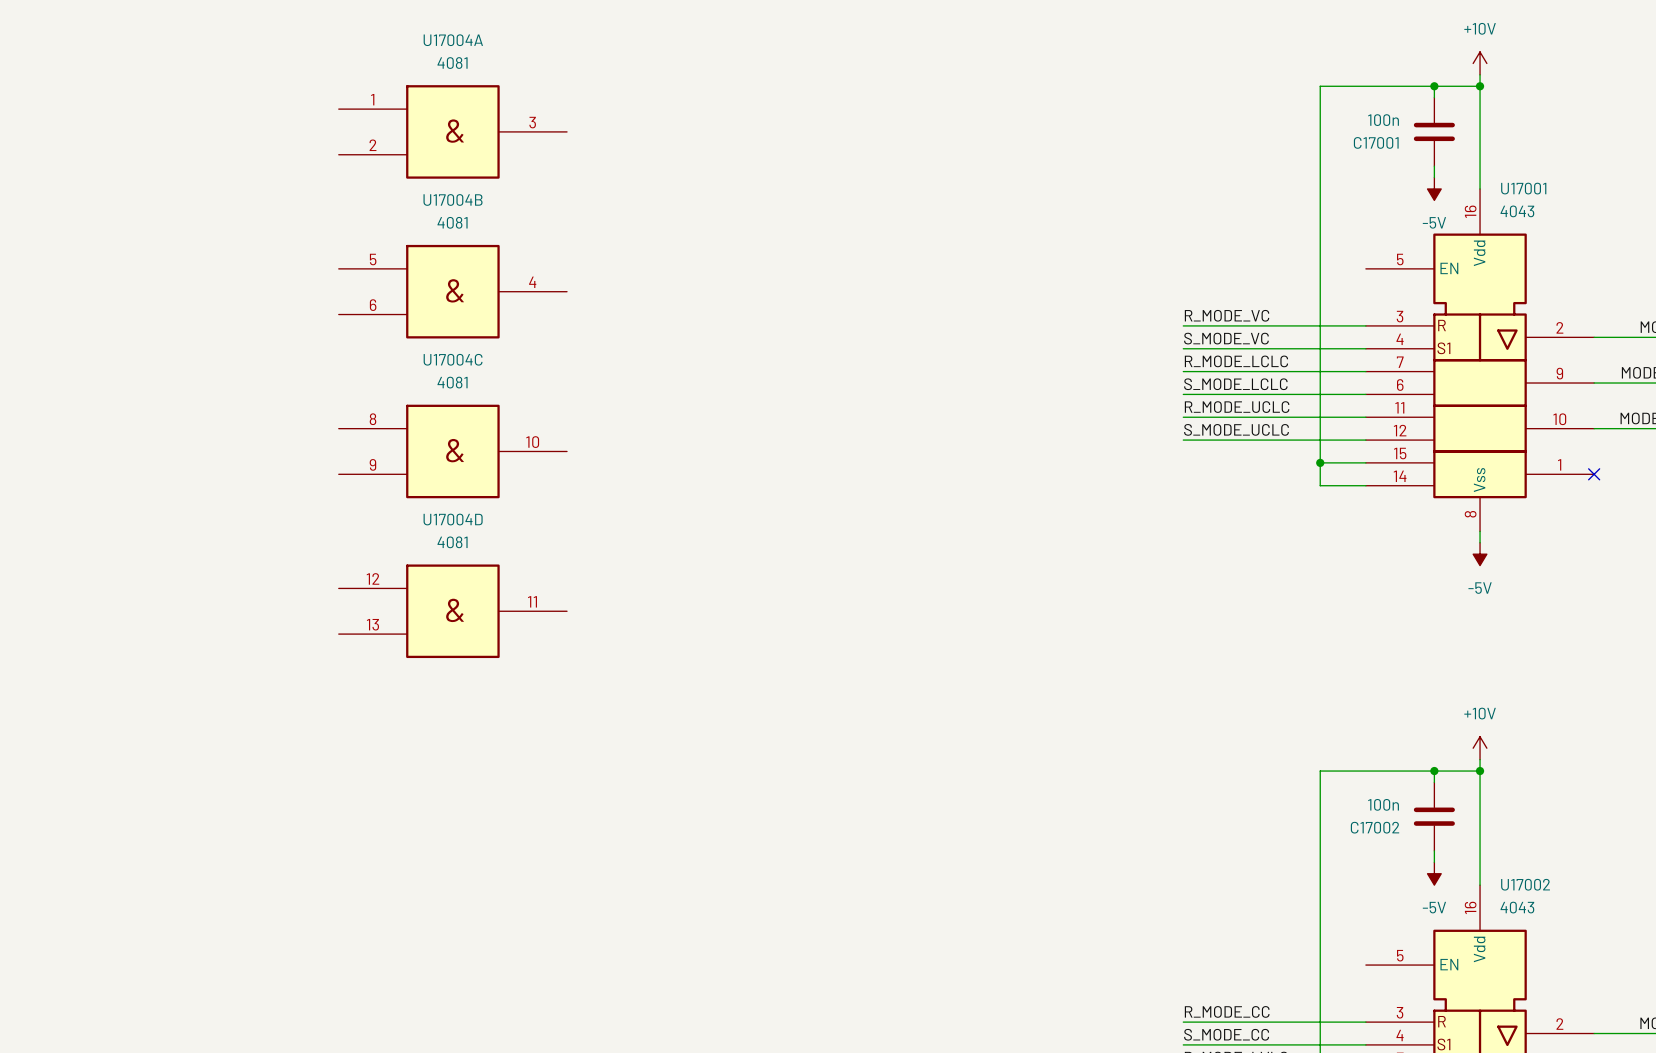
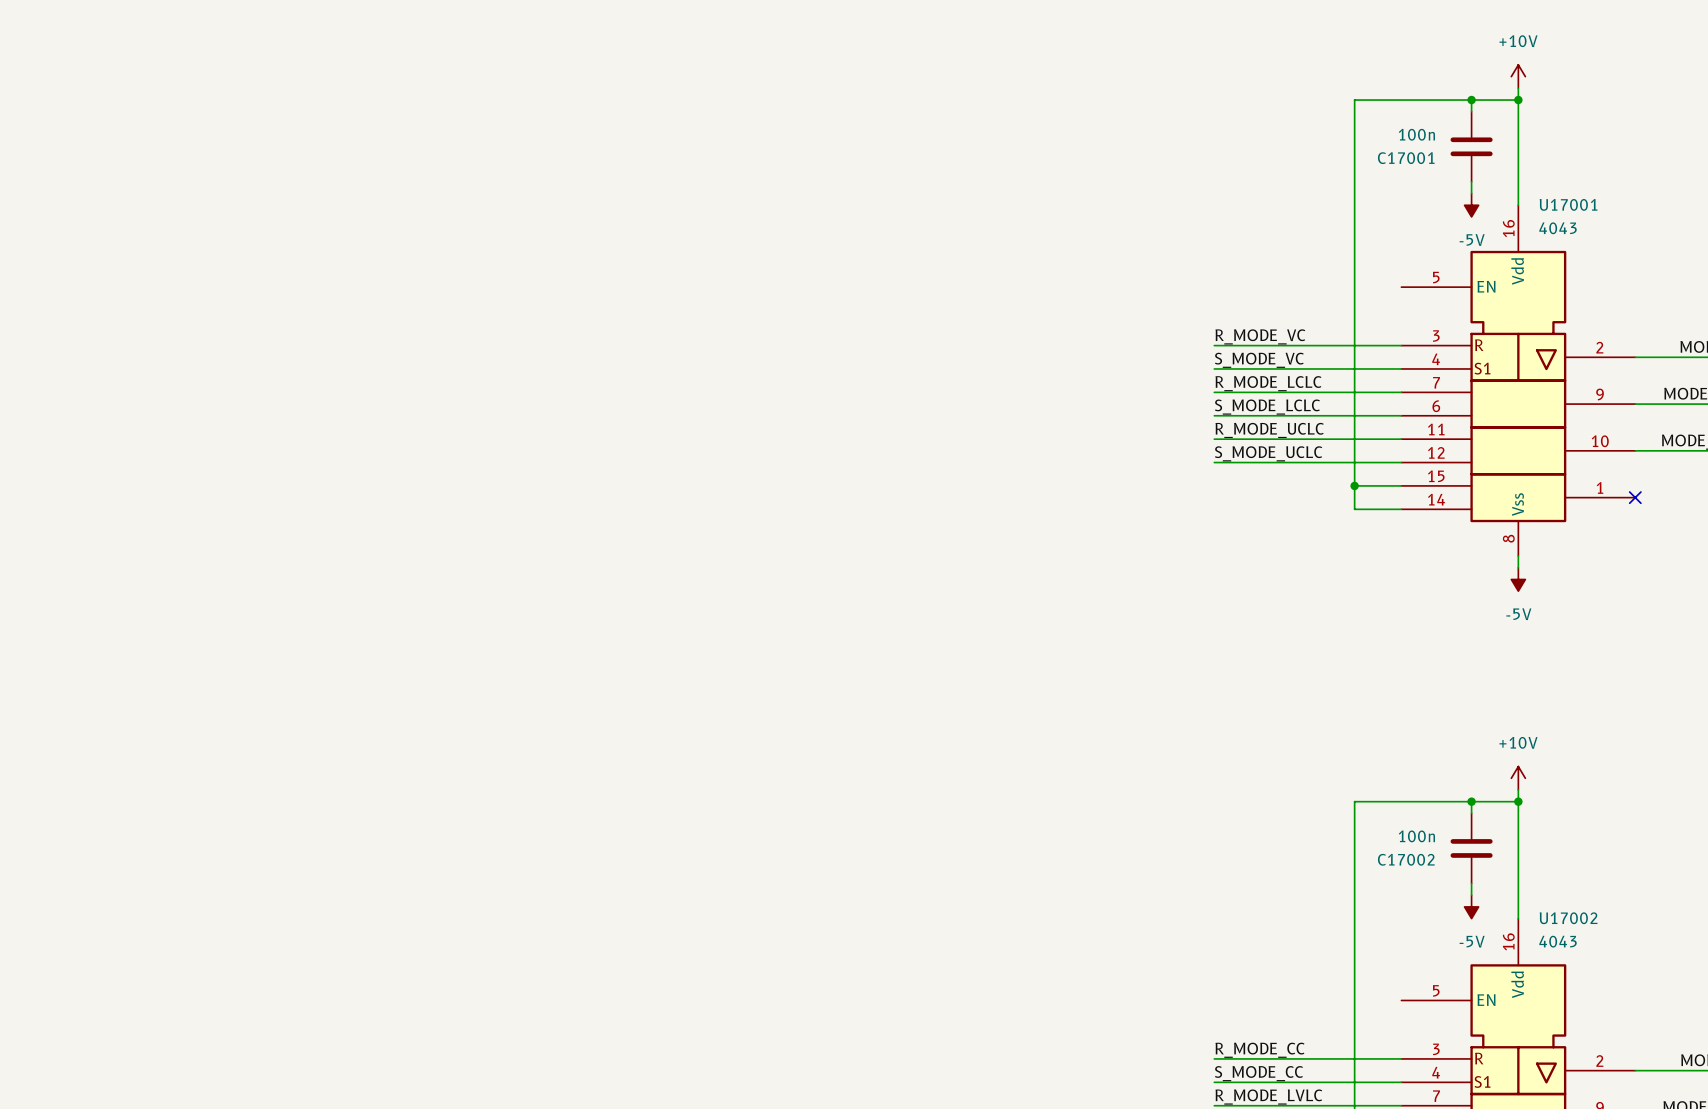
U17004A: 4081 (452, 131) -> none
U17004B: 4081 (452, 291) -> none
U17004C: 4081 (452, 451) -> none
U17004D: 4081 (452, 611) -> none

